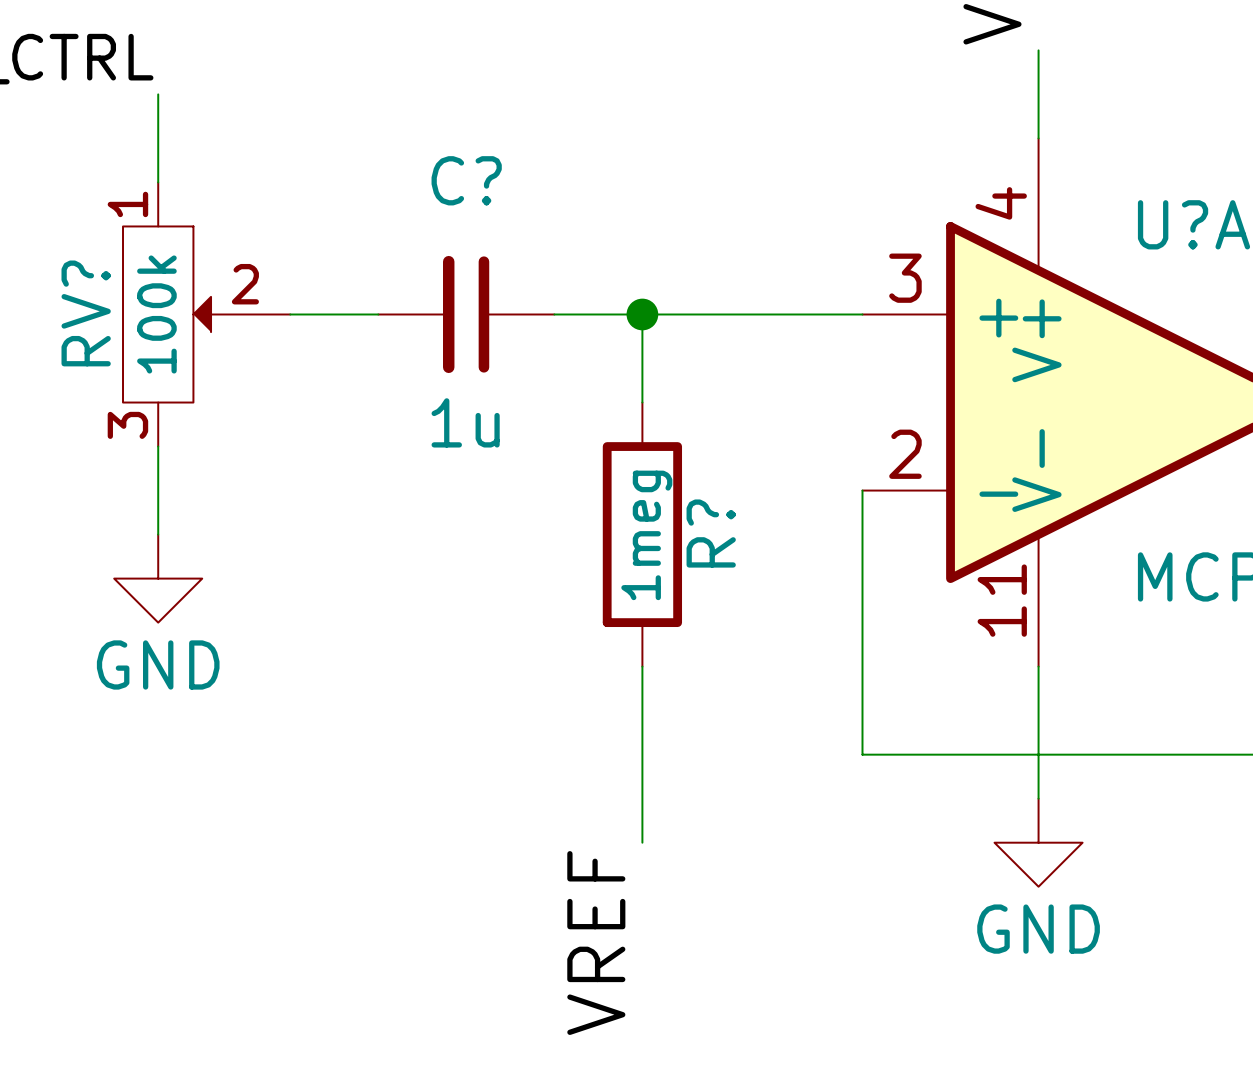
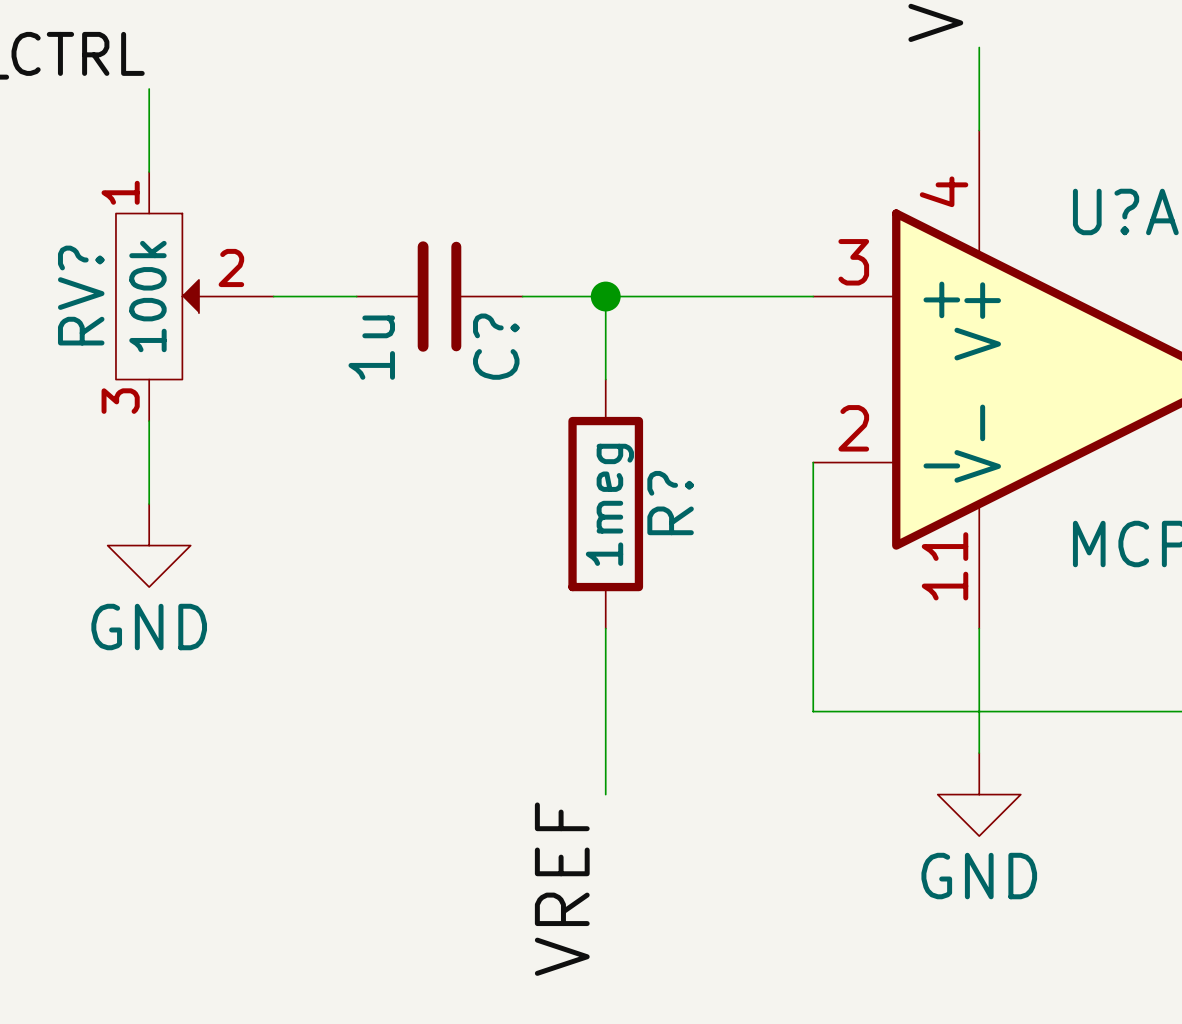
C? name rotation: 0° (466, 180) -> 90° counterclockwise (496, 346)
C? name position: C? (466, 180) -> C? (496, 346)
C? value rotation: 0° (465, 422) -> 90° counterclockwise (371, 347)

